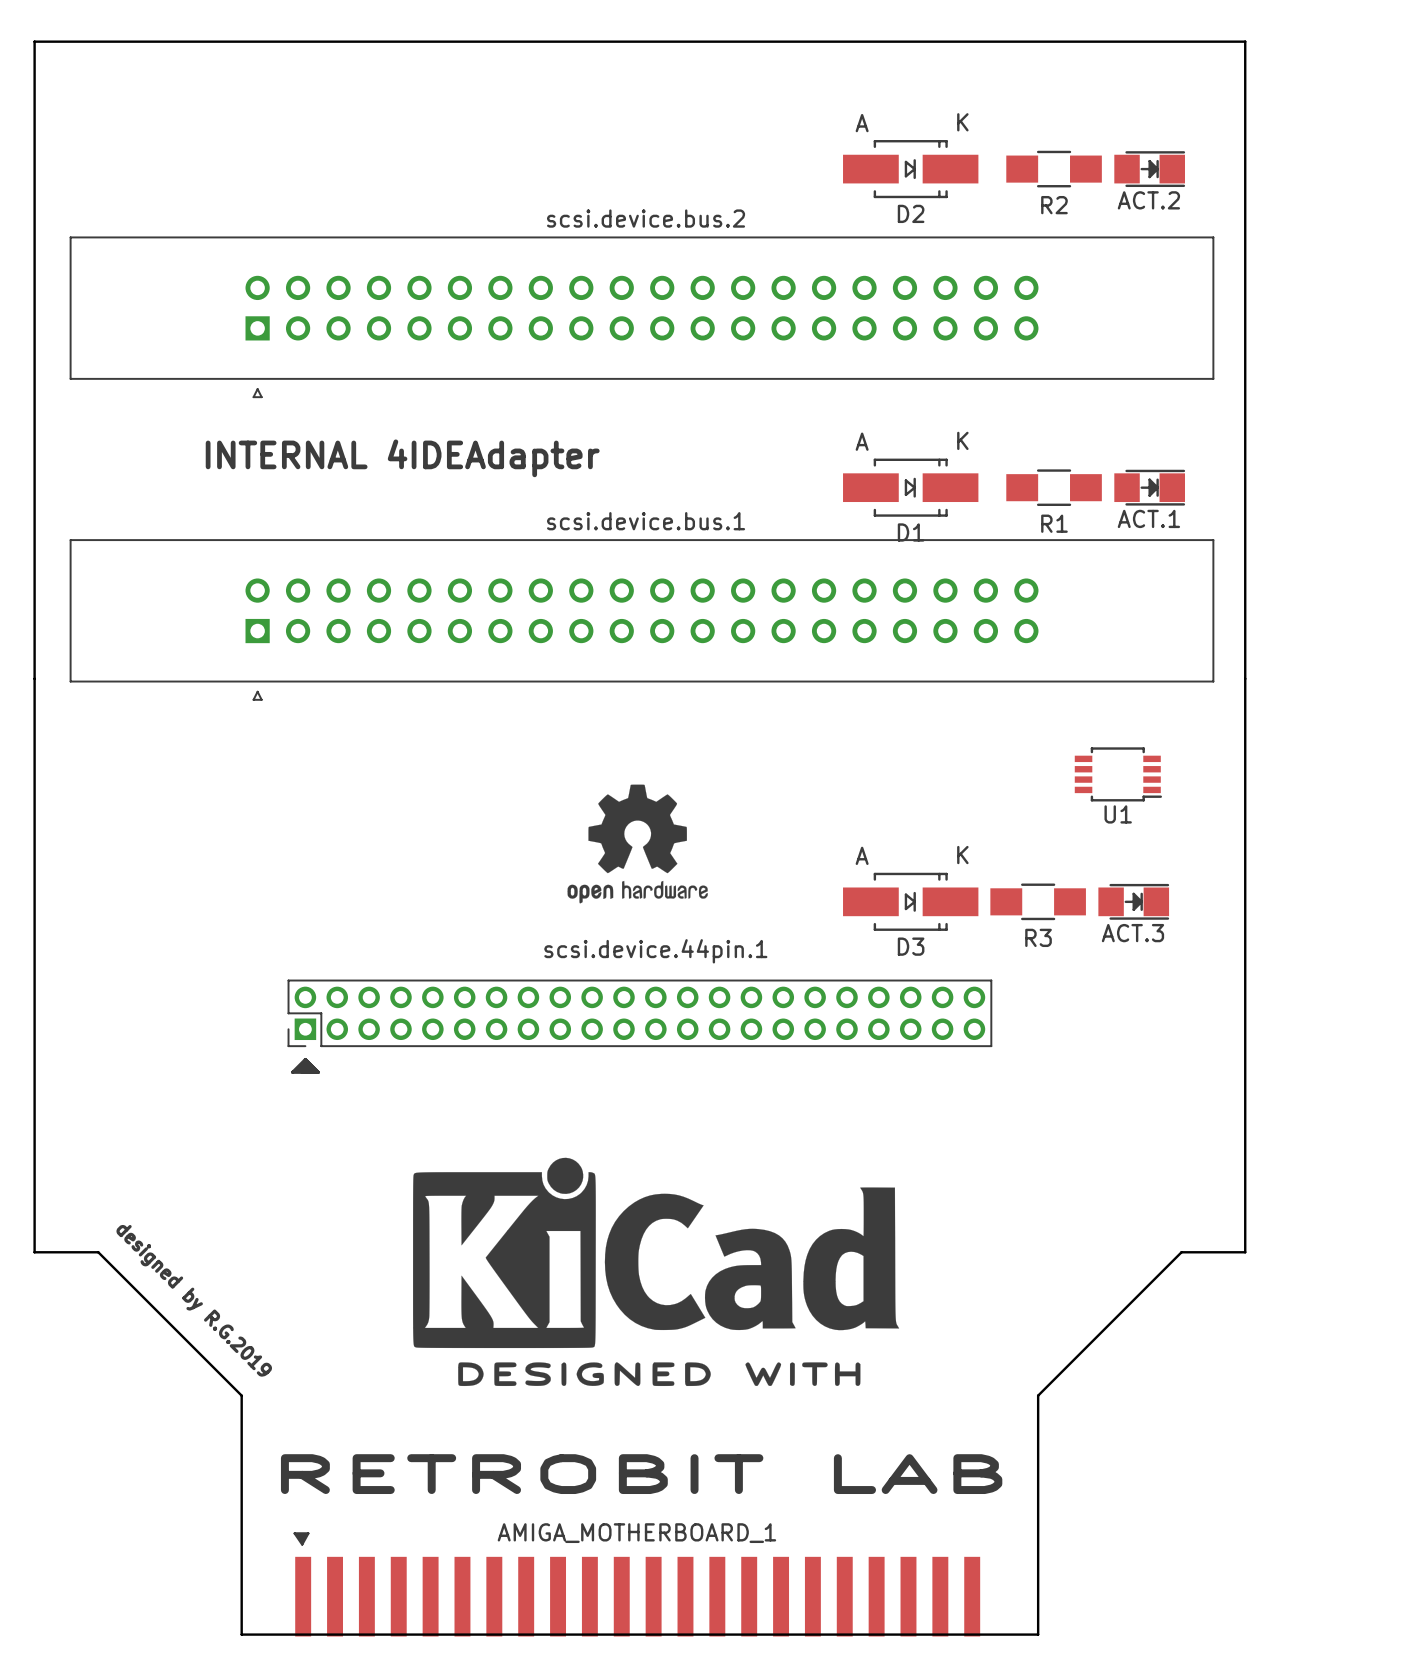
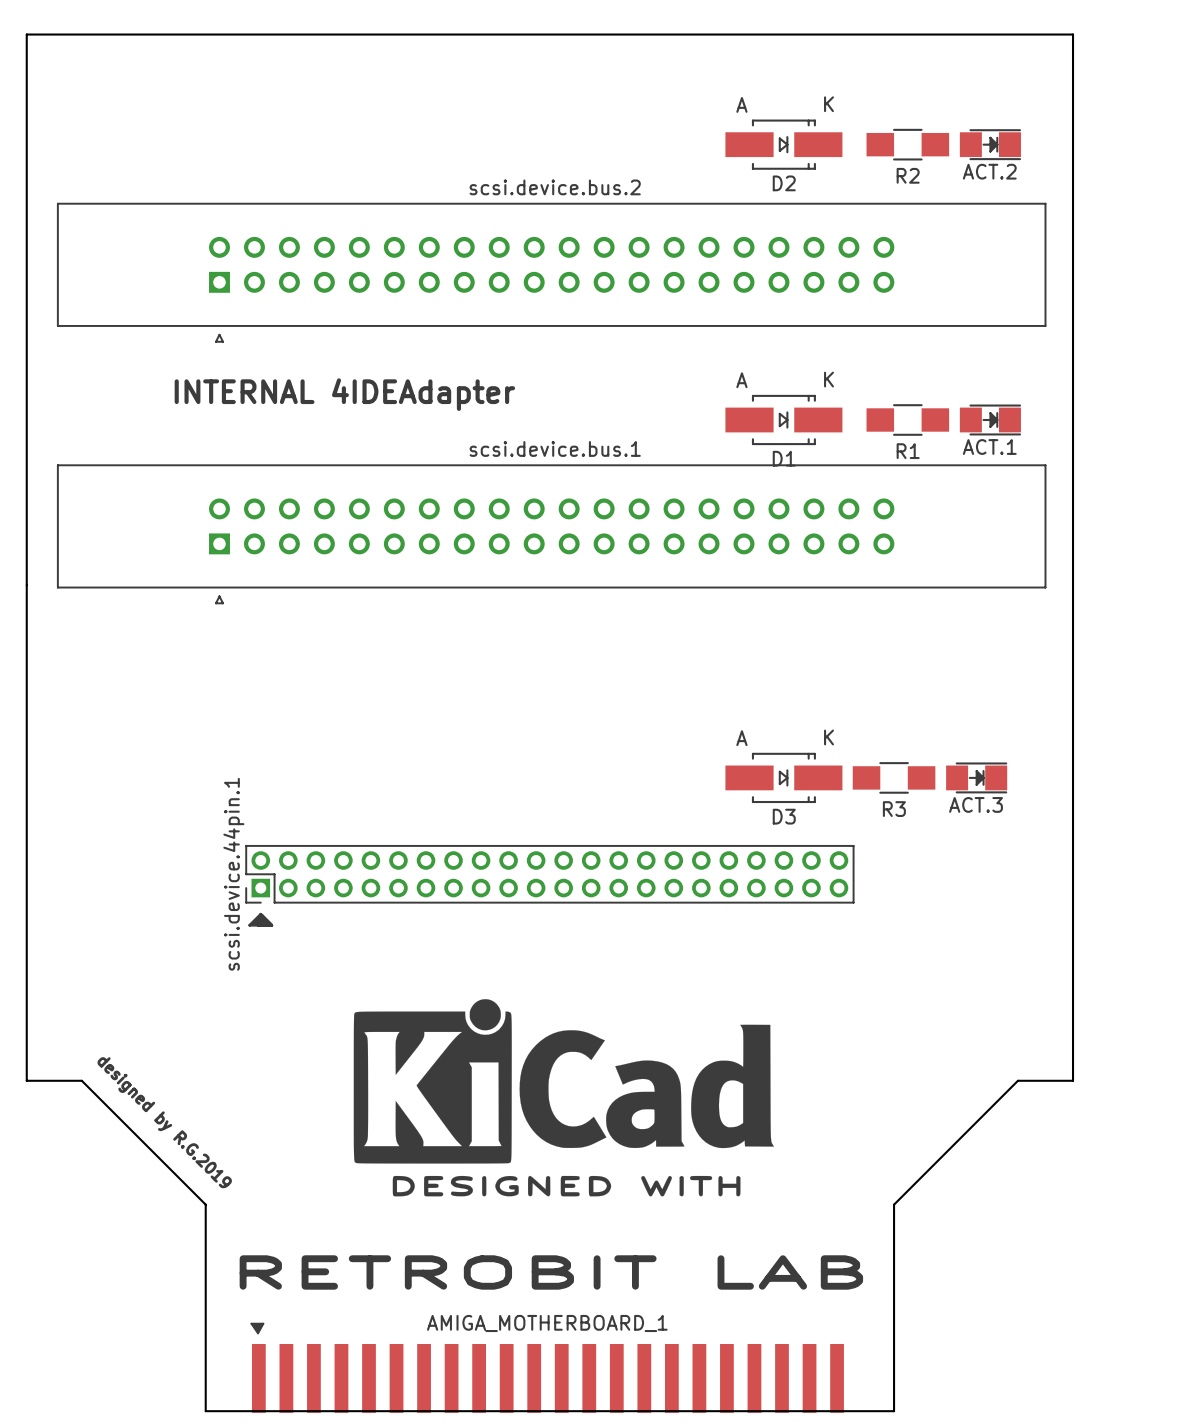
U1: (1118, 774) -> none
drawing: [567, 784, 708, 904] -> none
scsi.device.44pin.1 name rotation: 0° (655, 951) -> 90° counterclockwise (233, 874)
scsi.device.44pin.1 name position: scsi.device.44pin.1 (655, 951) -> scsi.device.44pin.1 (233, 874)

